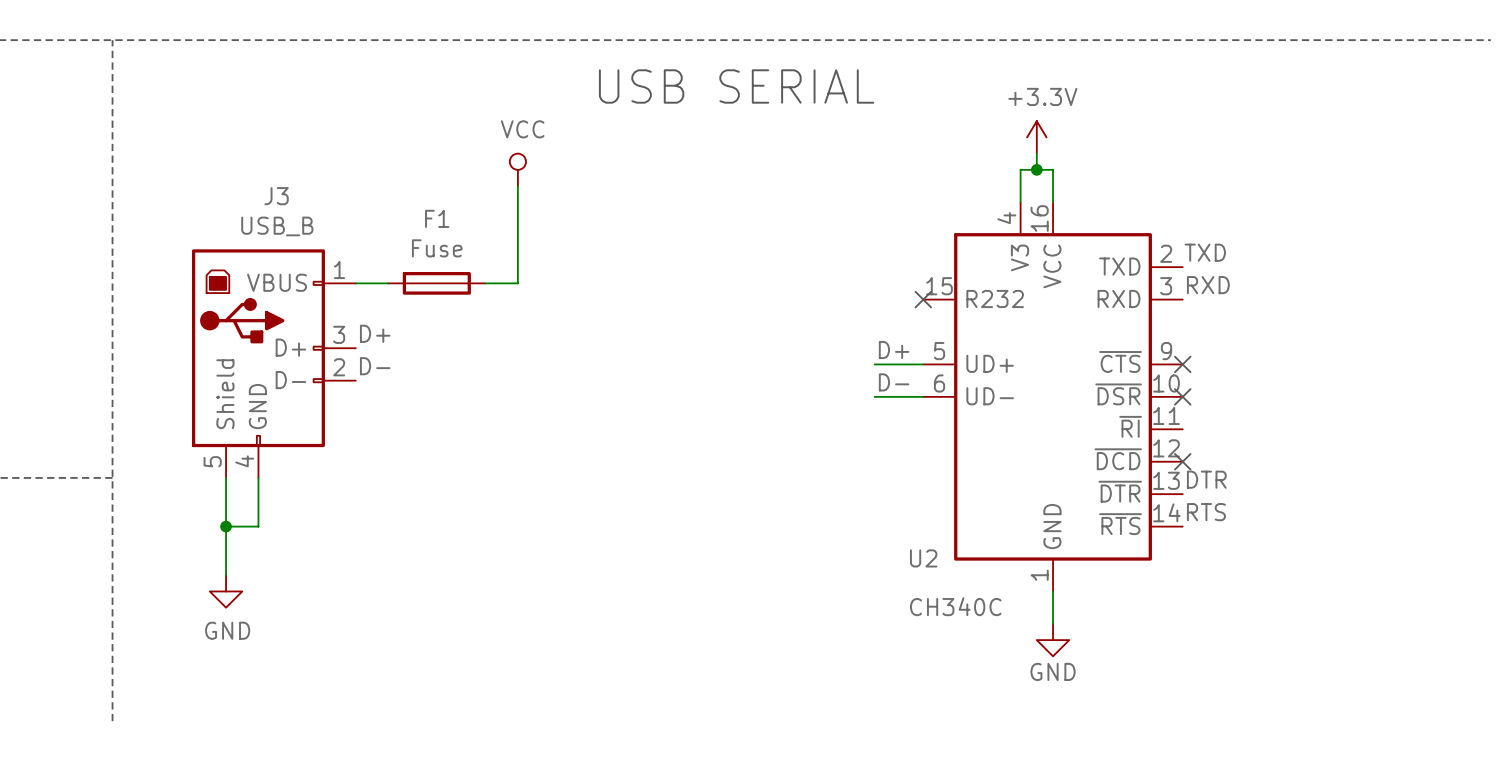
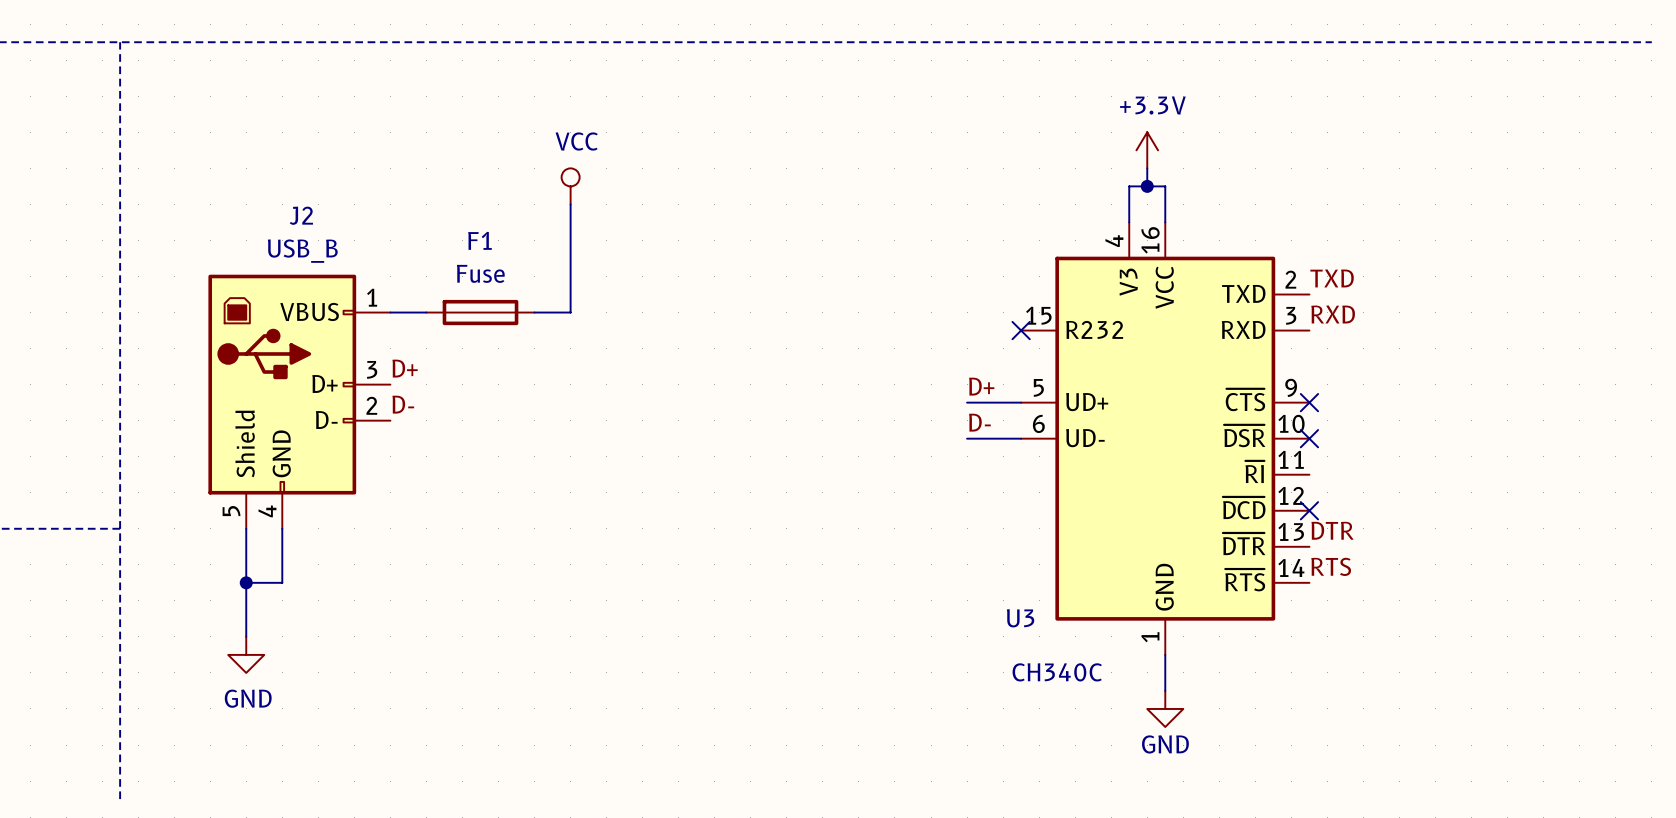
text: USB SERIAL (736, 86) -> none
J3 name: J3 (276, 196) -> J2 (301, 215)
U2 name: U2 (923, 558) -> U3 (1020, 618)

